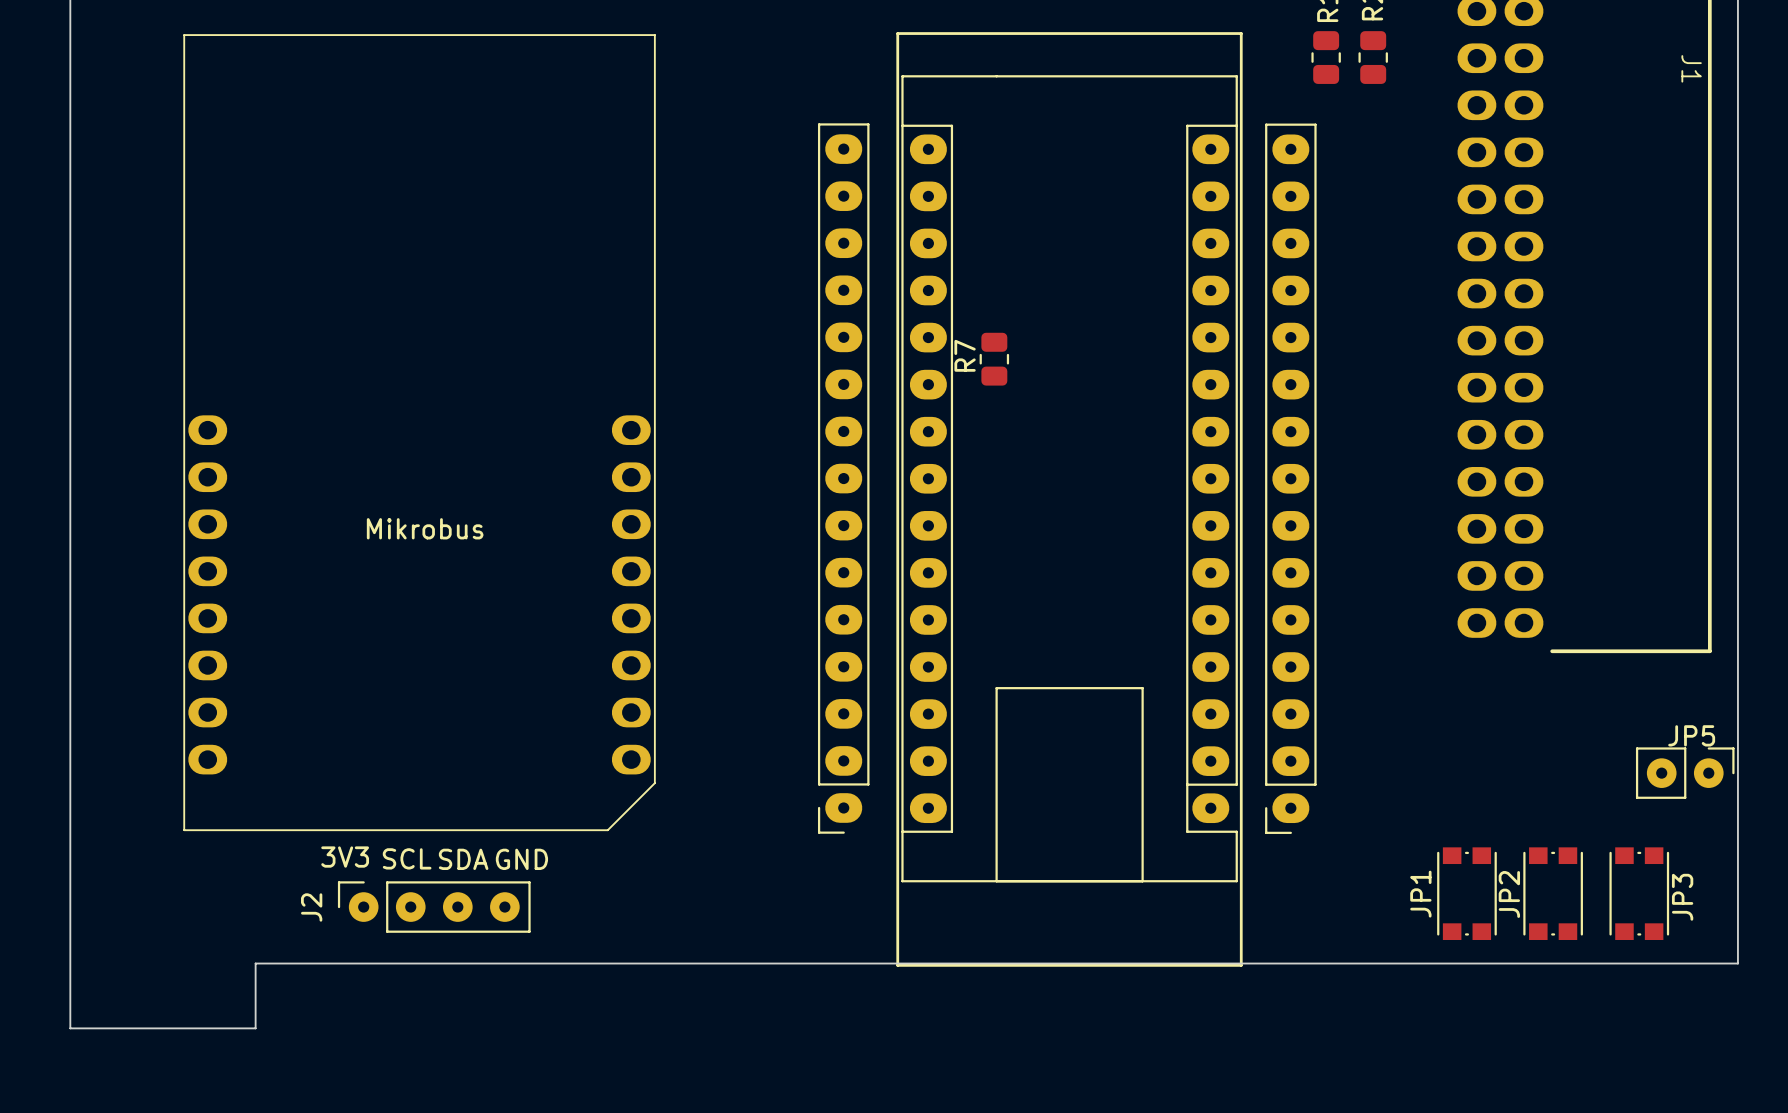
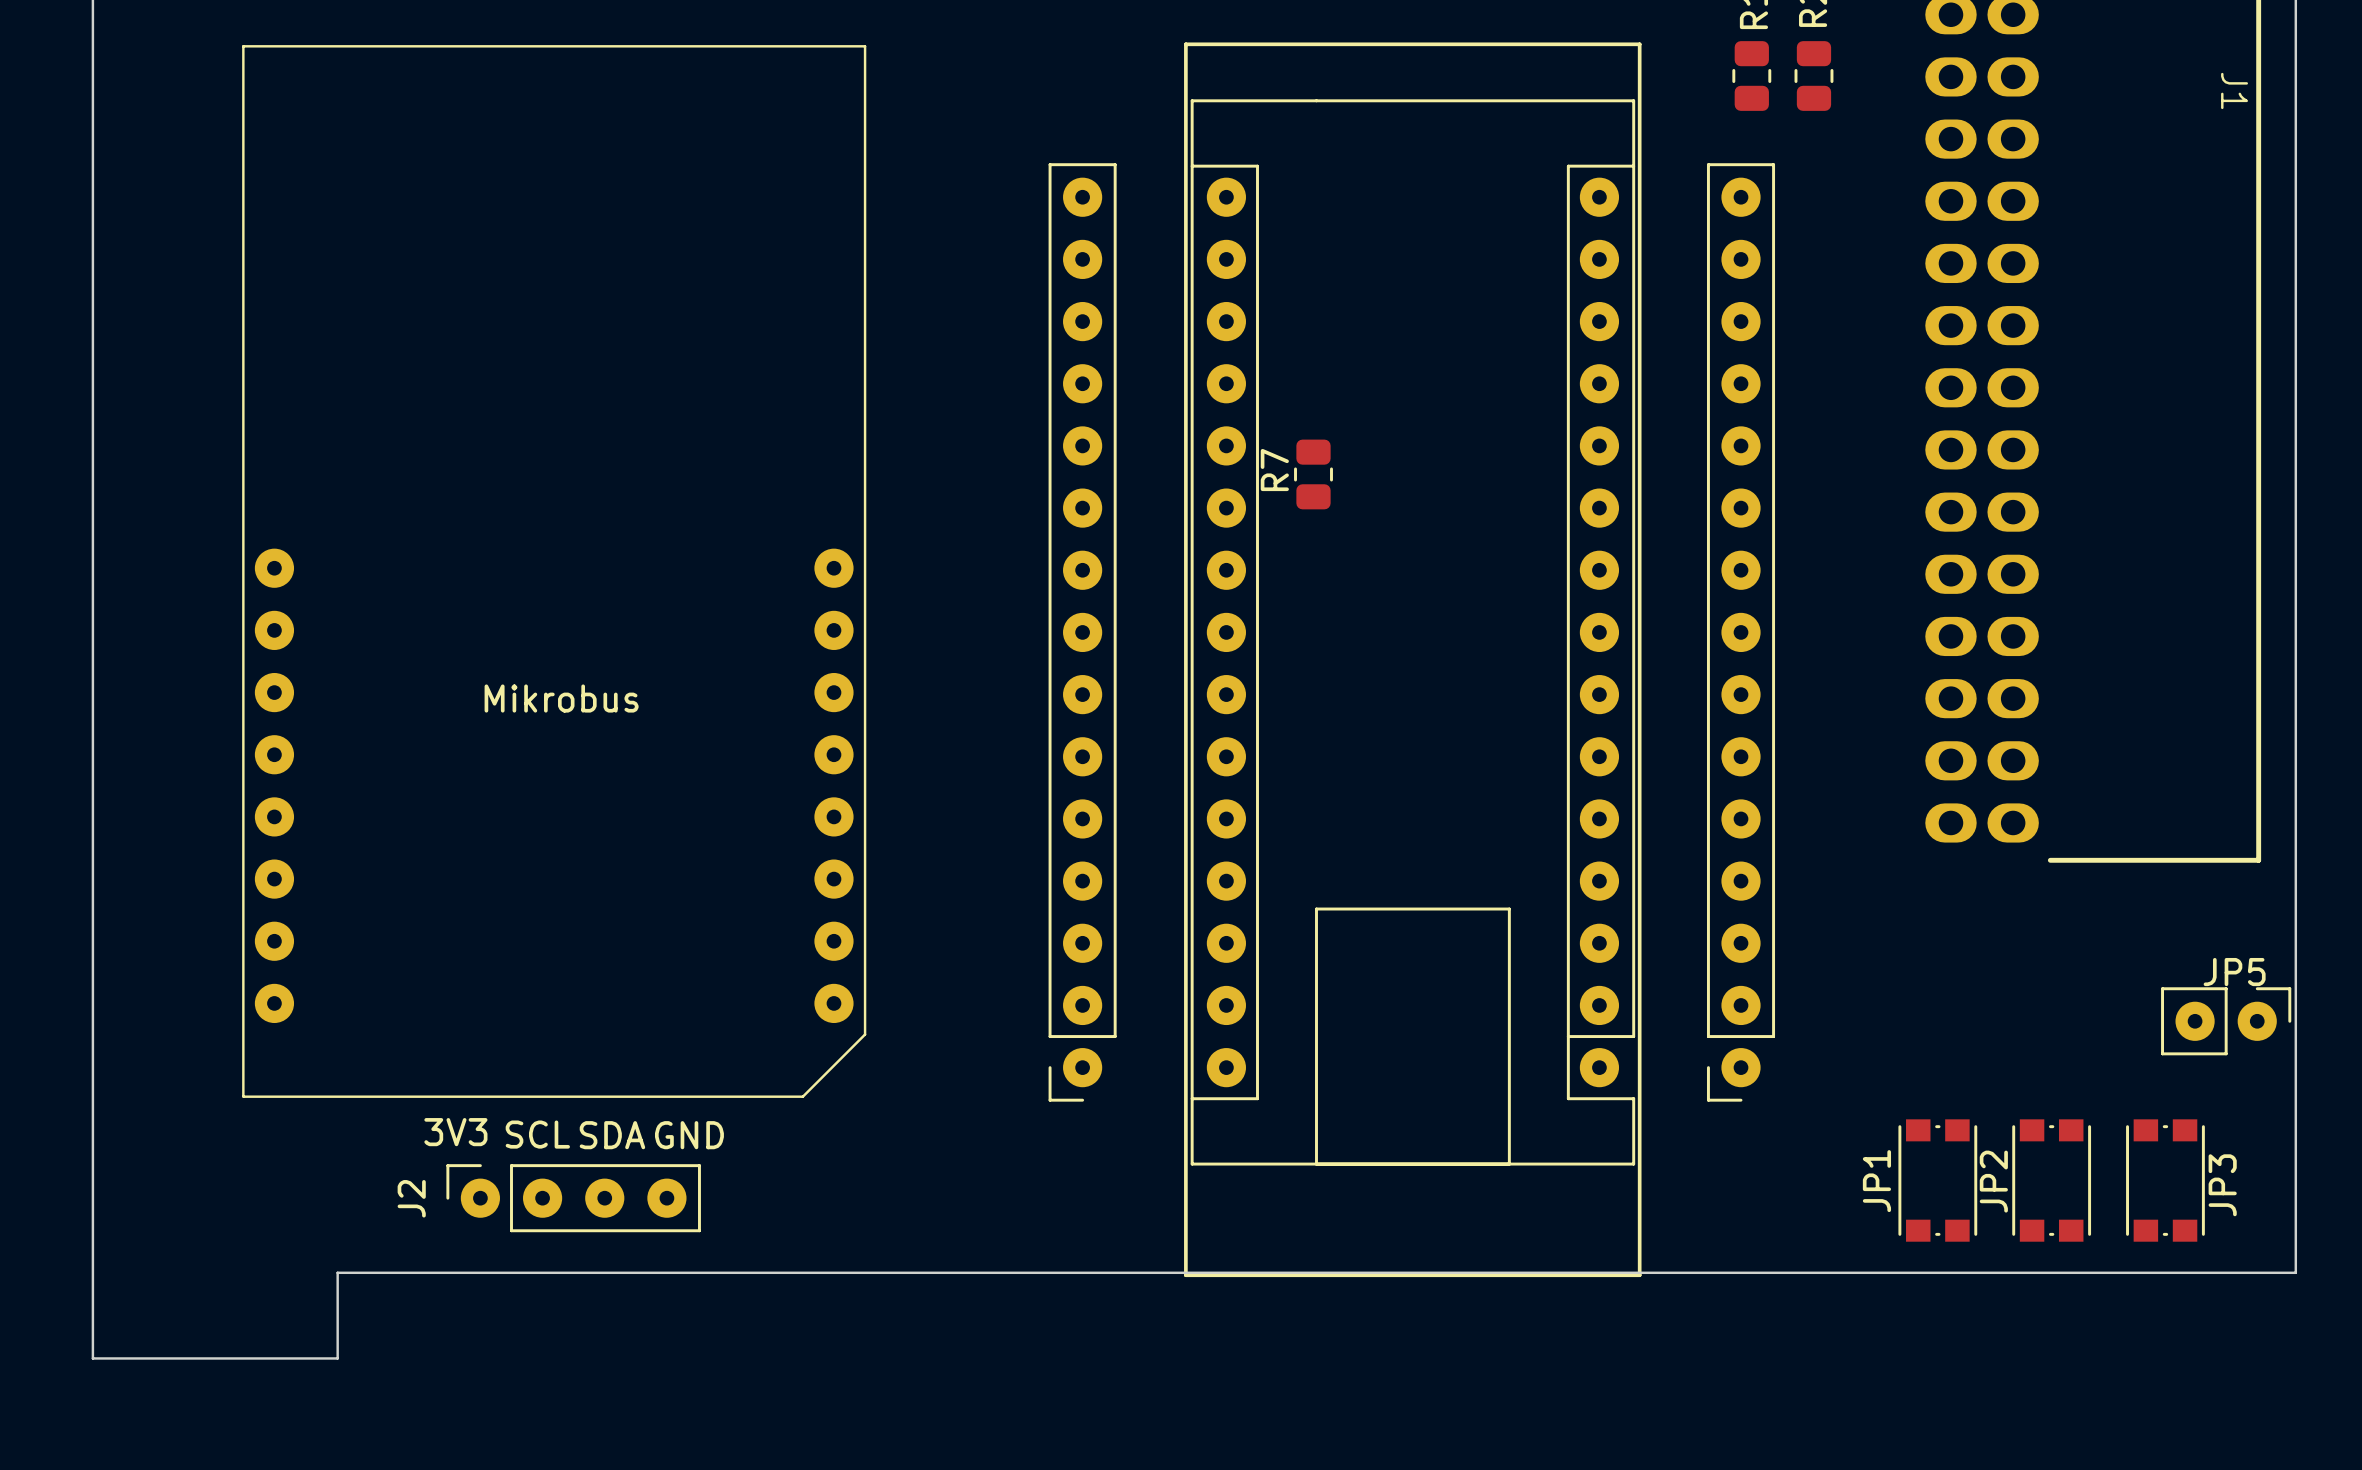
part footprint: [901, 75, 1238, 883] -> [1190, 99, 1636, 1166]
part footprint: [188, 415, 228, 775] -> [254, 548, 295, 1024]
part footprint: [611, 415, 651, 775] -> [814, 548, 854, 1024]
part: none -> (1082, 632)
part: (843, 478) -> none
part: (1290, 478) -> none
part: none -> (1741, 632)

